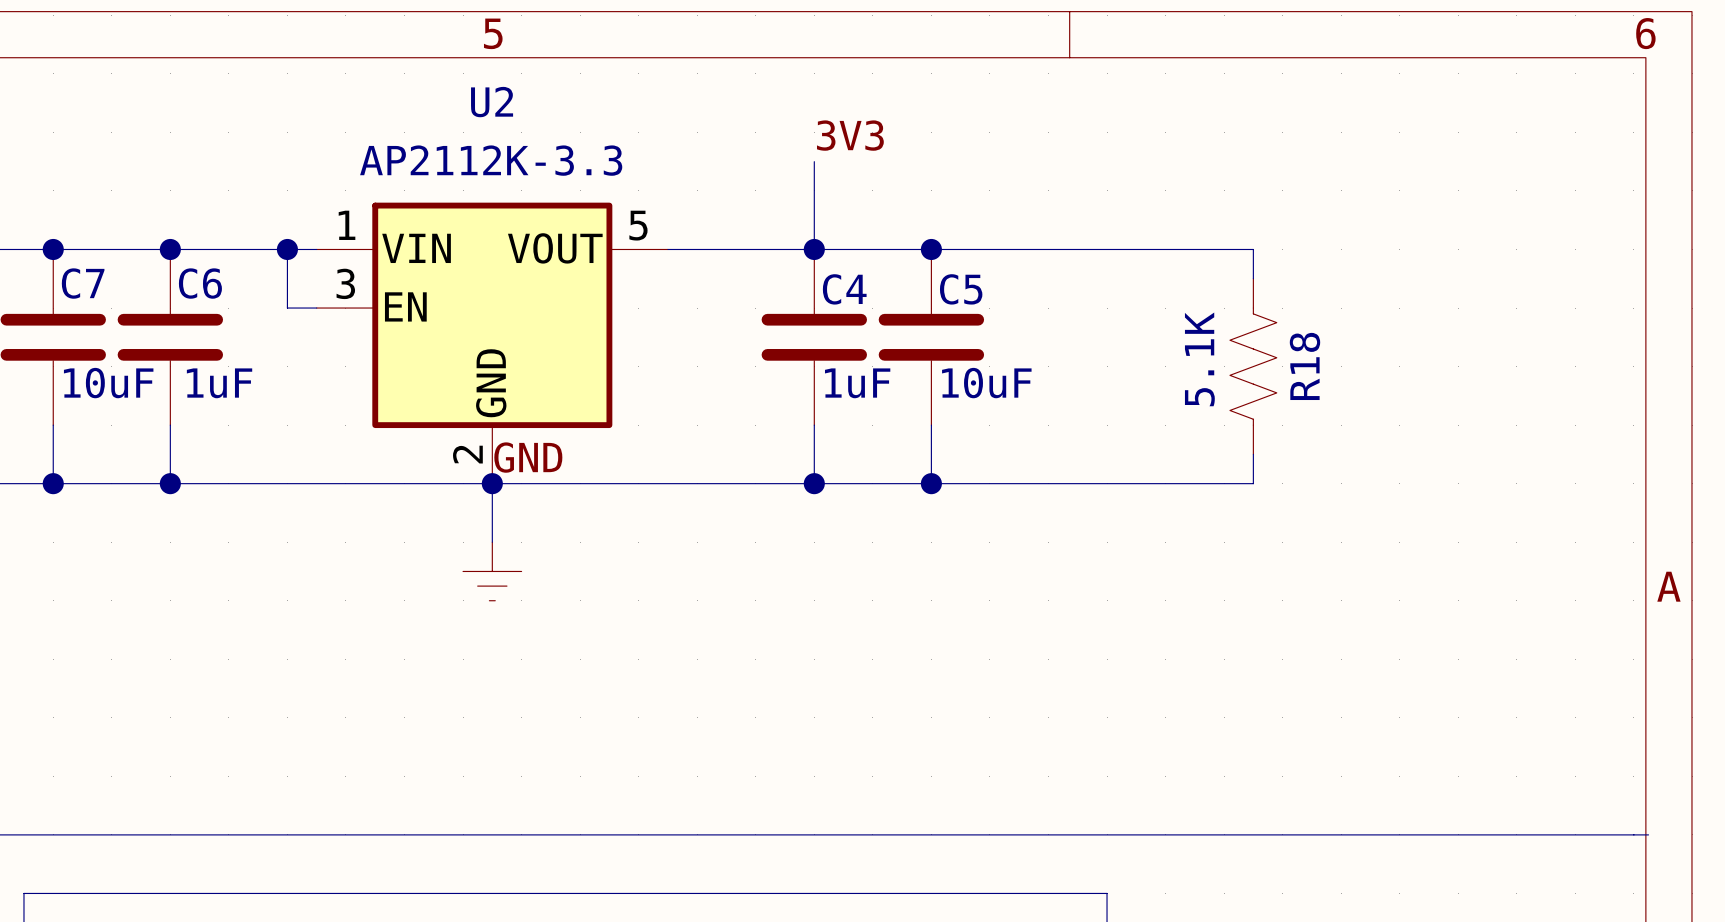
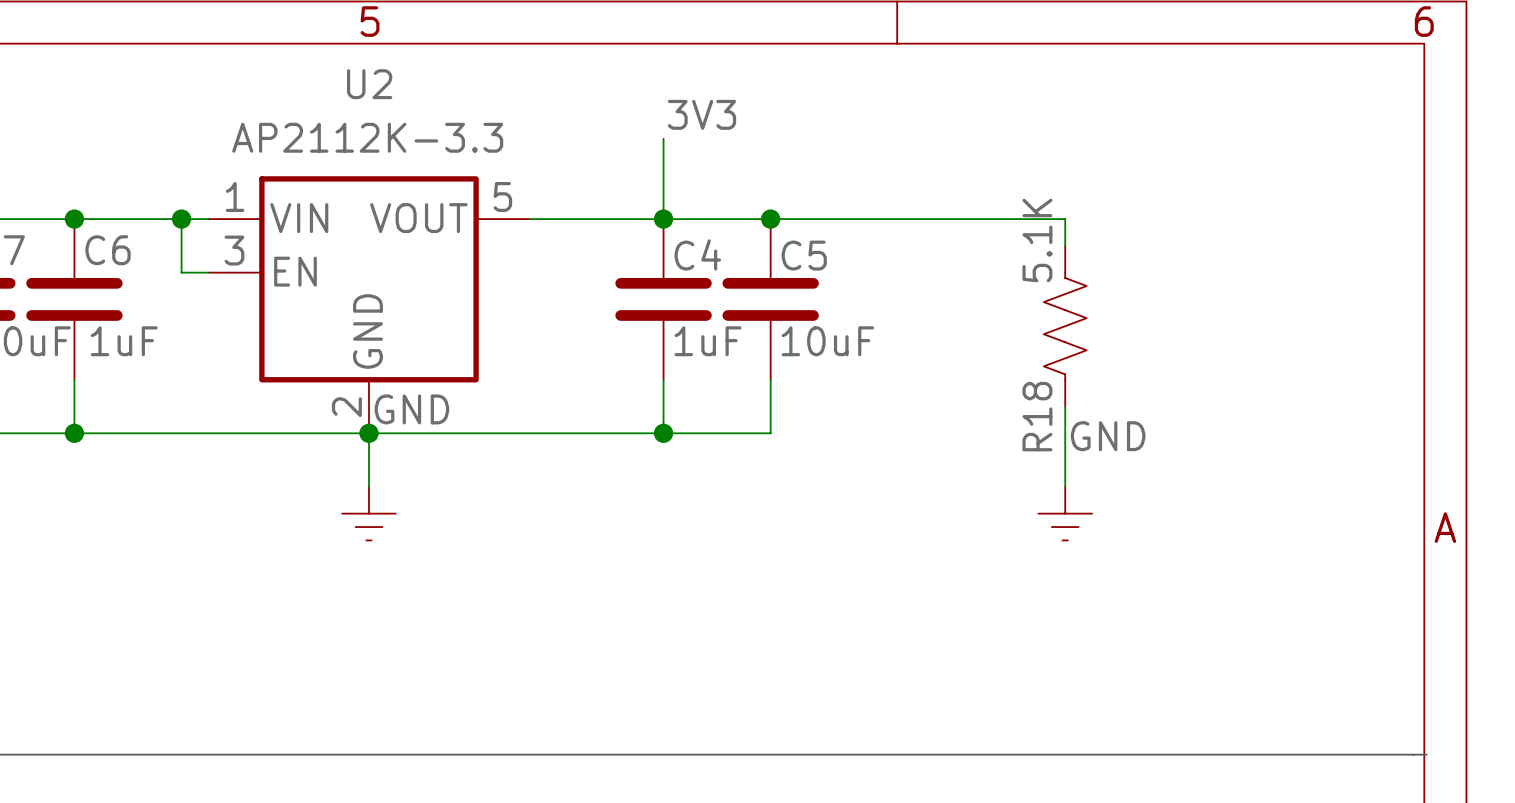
R18 value position: 5.1K (1199, 359) -> 5.1K (1037, 240)
R18 name position: R18 (1304, 366) -> R18 (1037, 416)
wire: (931, 483) (1253, 483) -> (1065, 486) (1065, 433)
junction: (931, 483) -> none
label: none -> GND (1108, 436)
power symbol: none -> (1065, 513)

